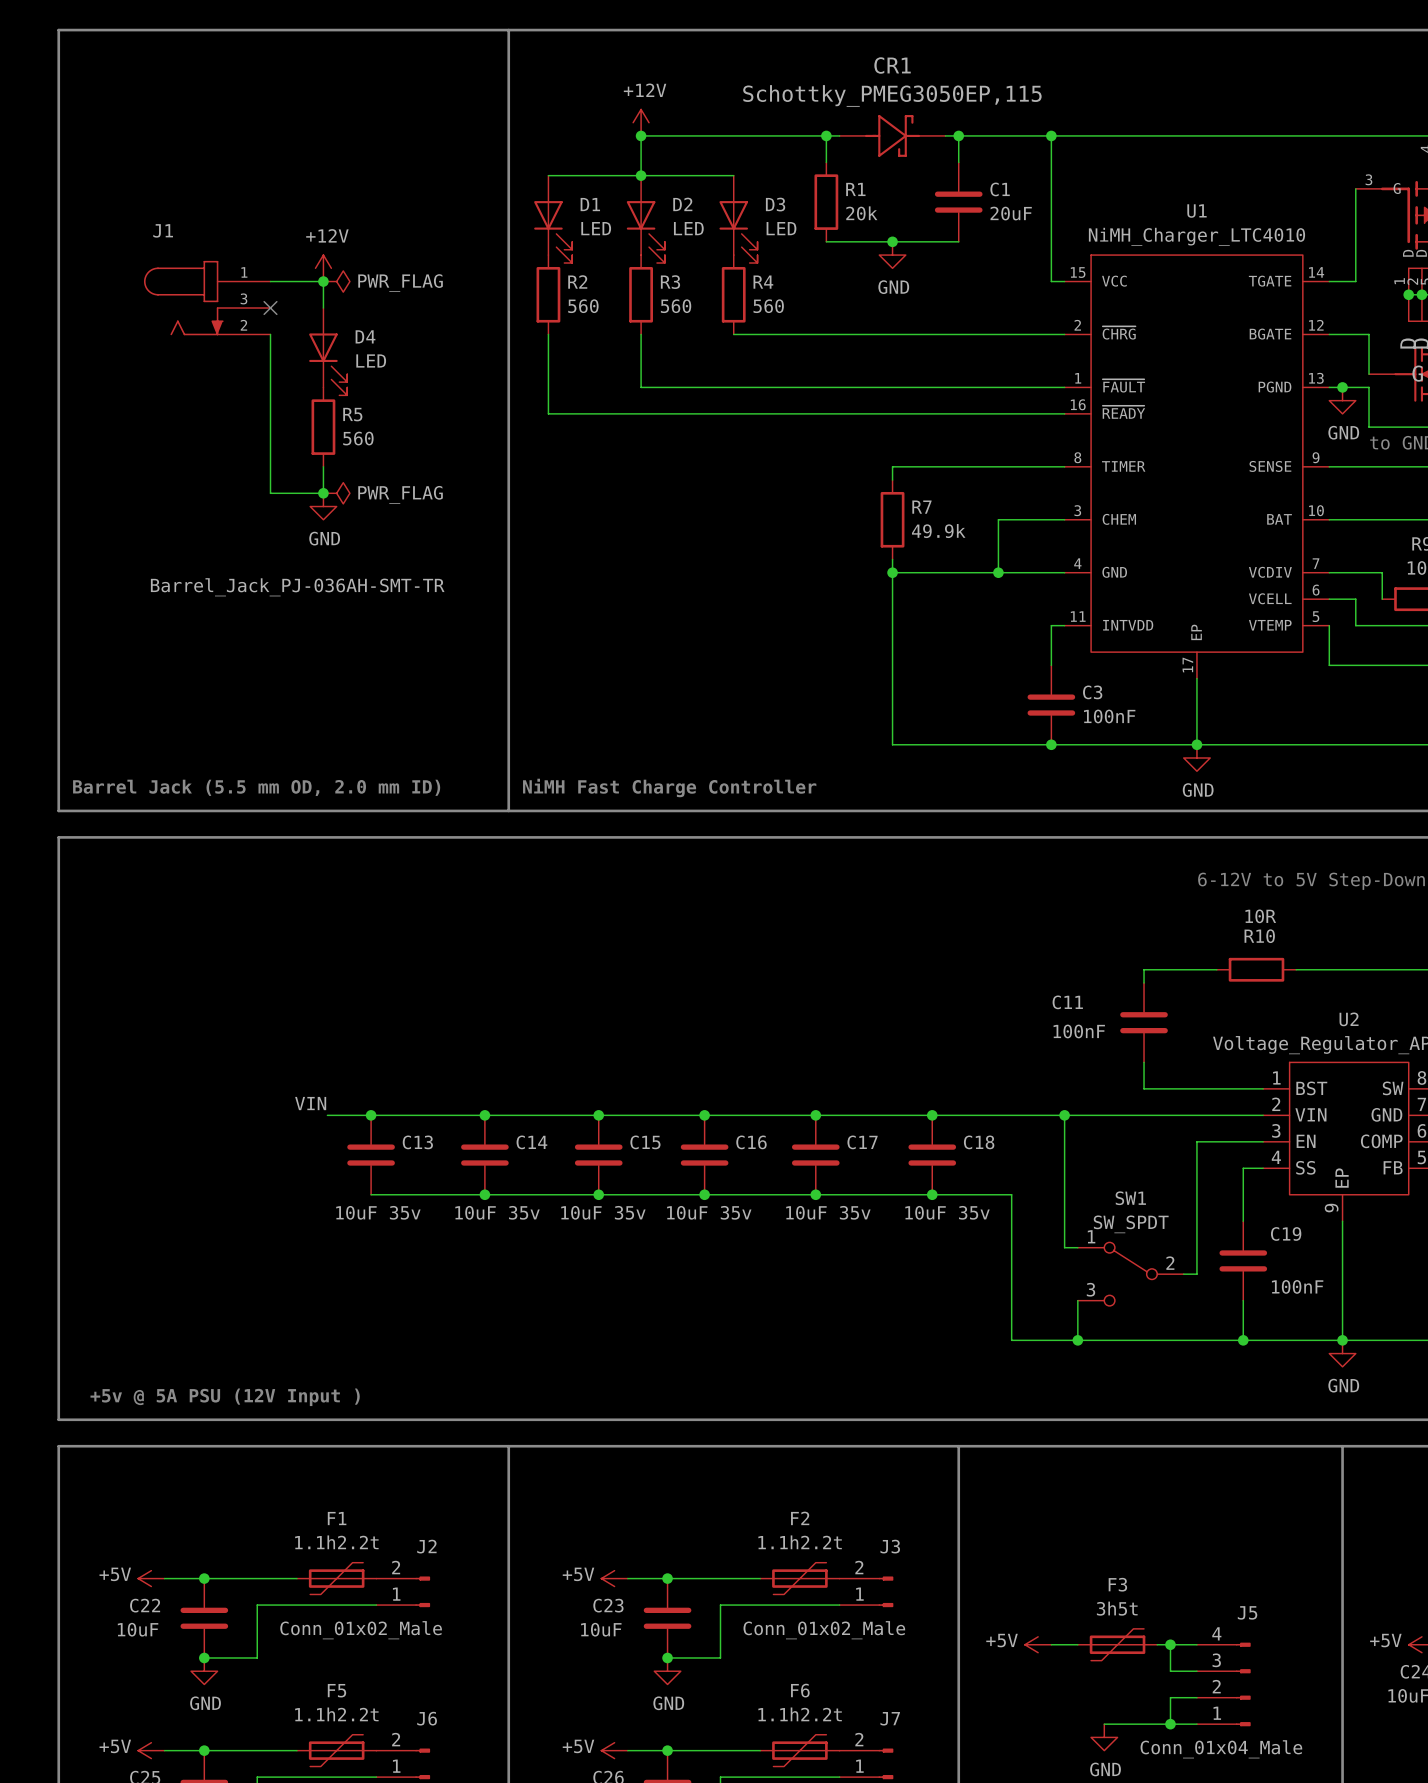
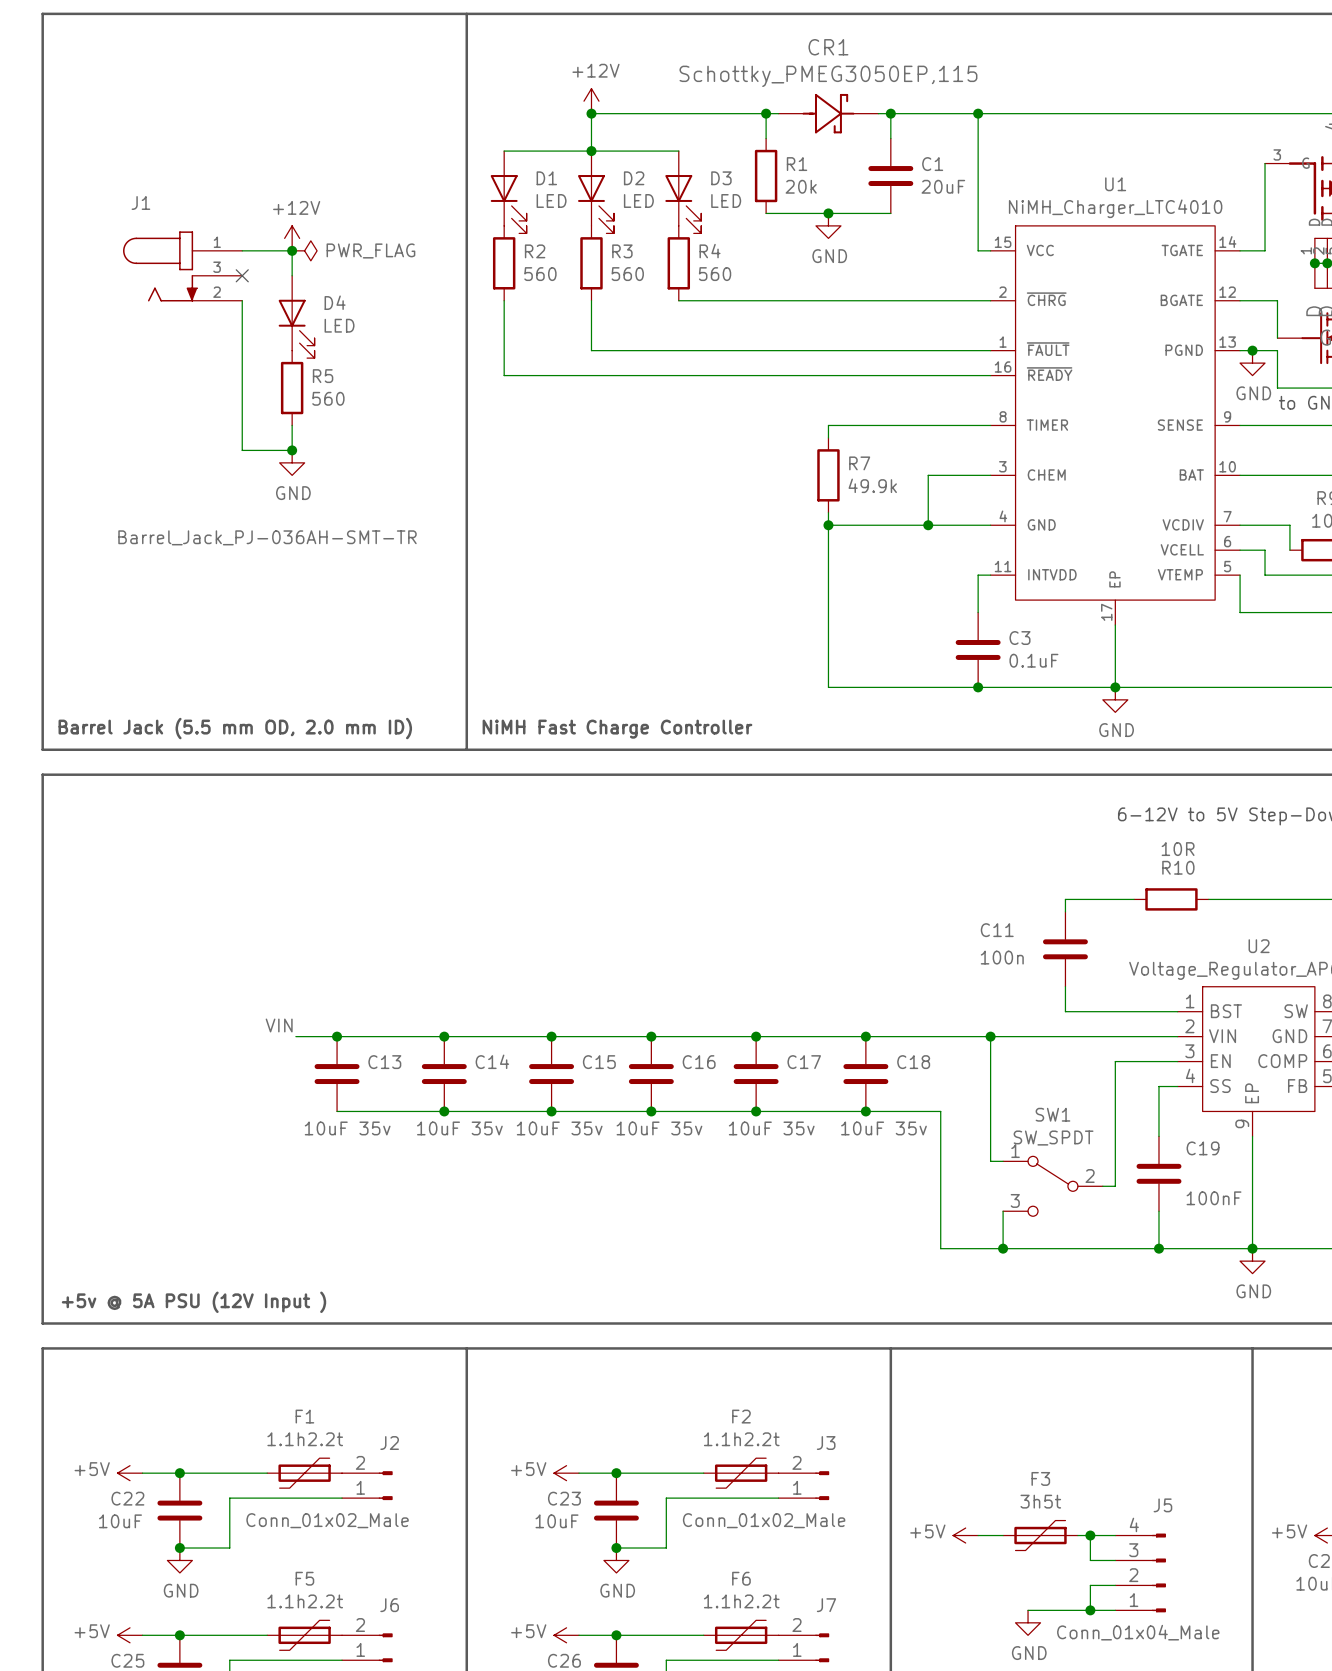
power symbol: PWR_FLAG (336, 493) -> none
C3 value: 100nF (1109, 716) -> 0.1uF (1033, 660)
C11 value: 100nF (1079, 1031) -> 100n (1002, 957)

